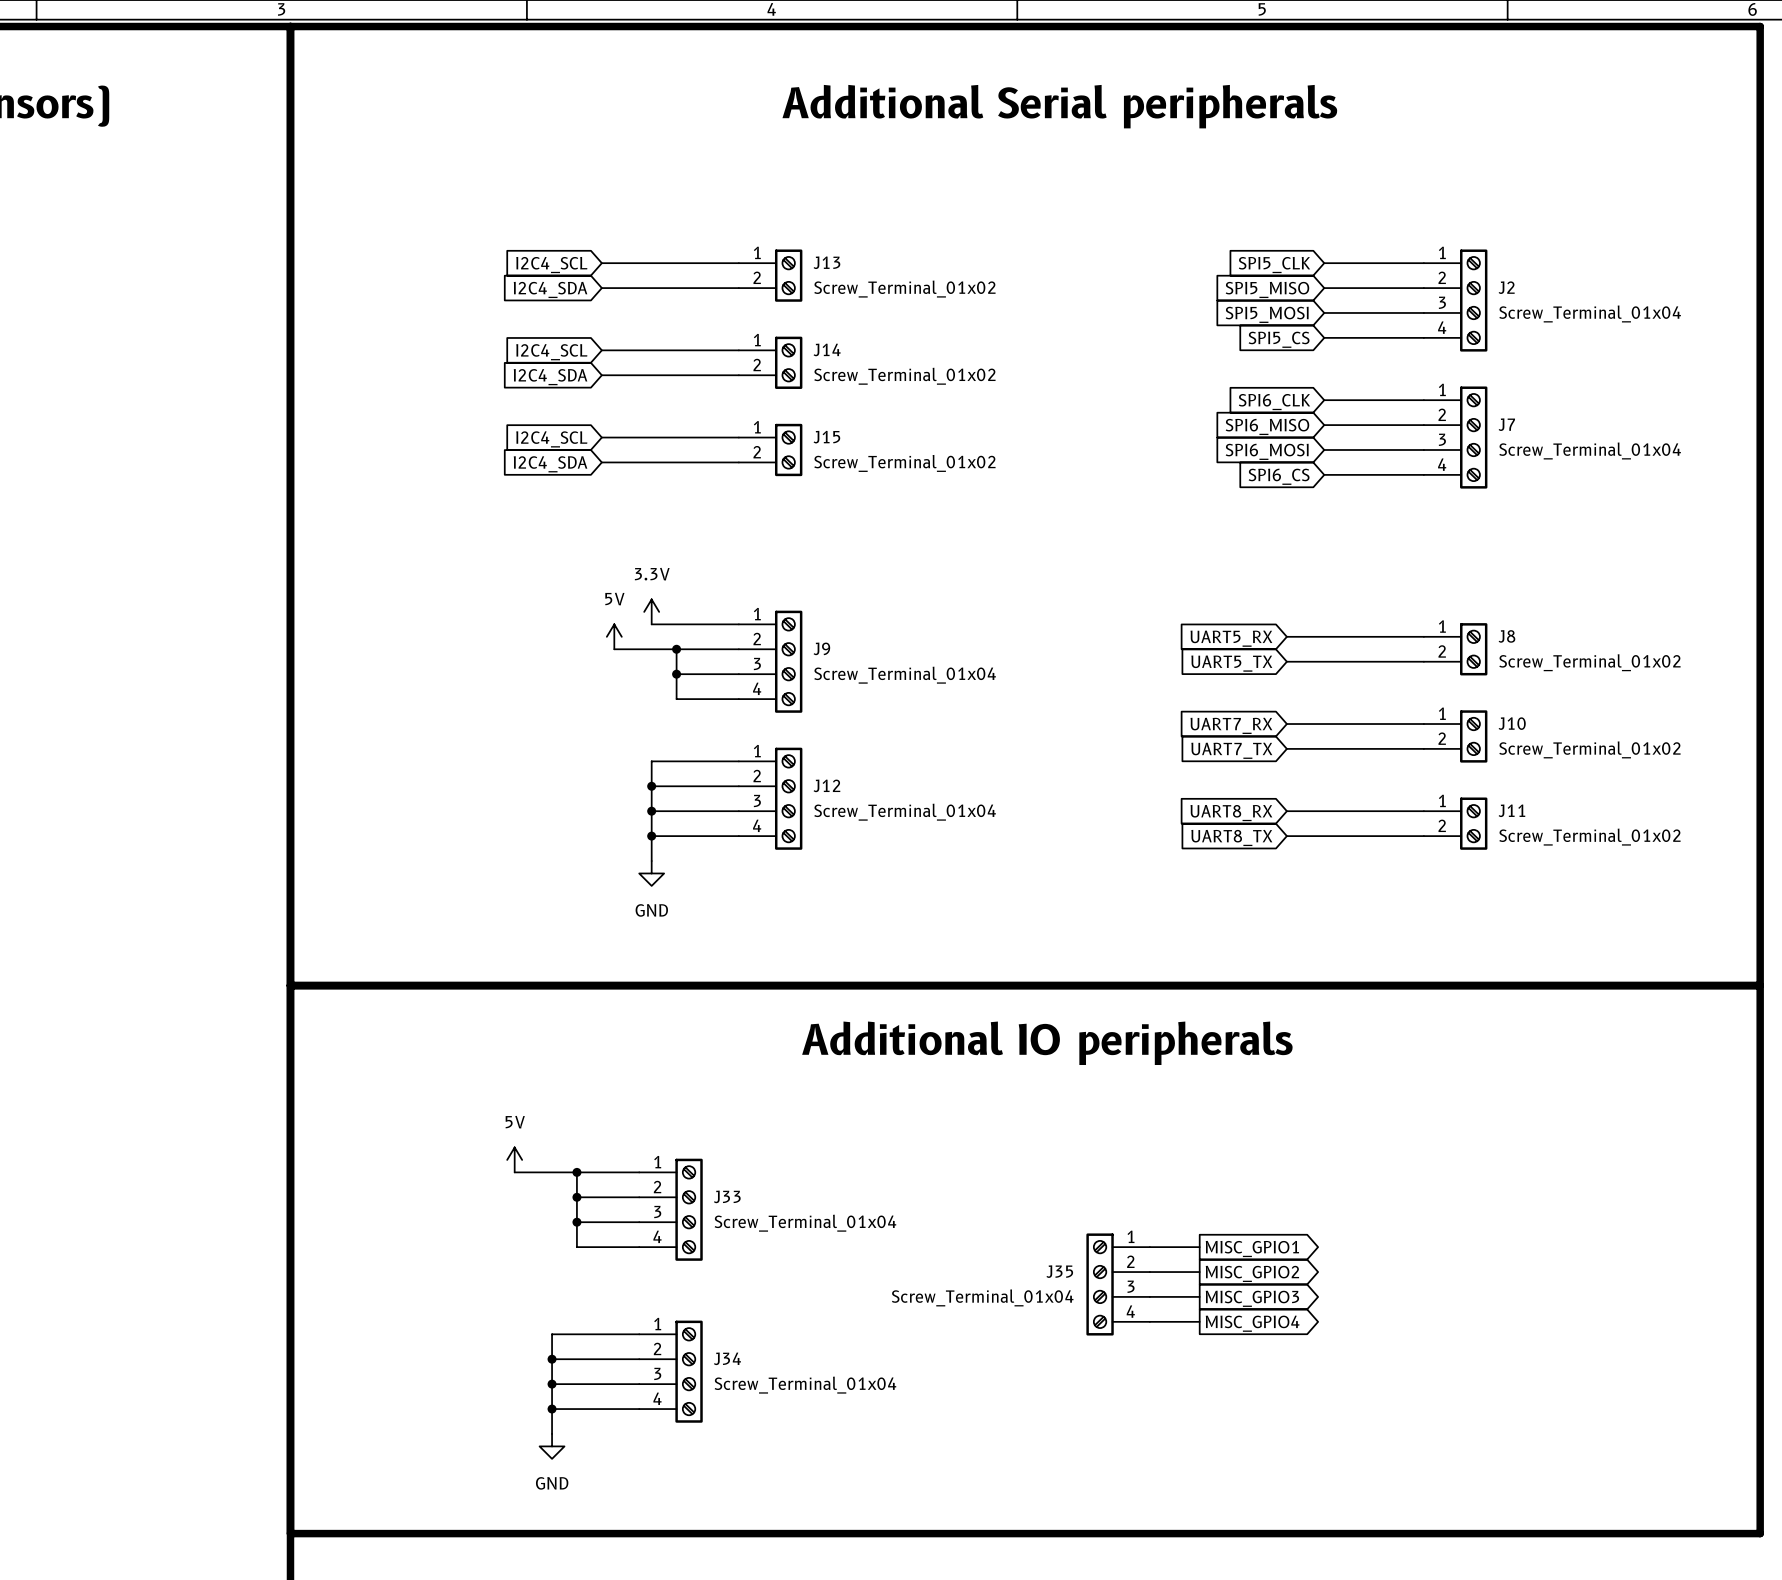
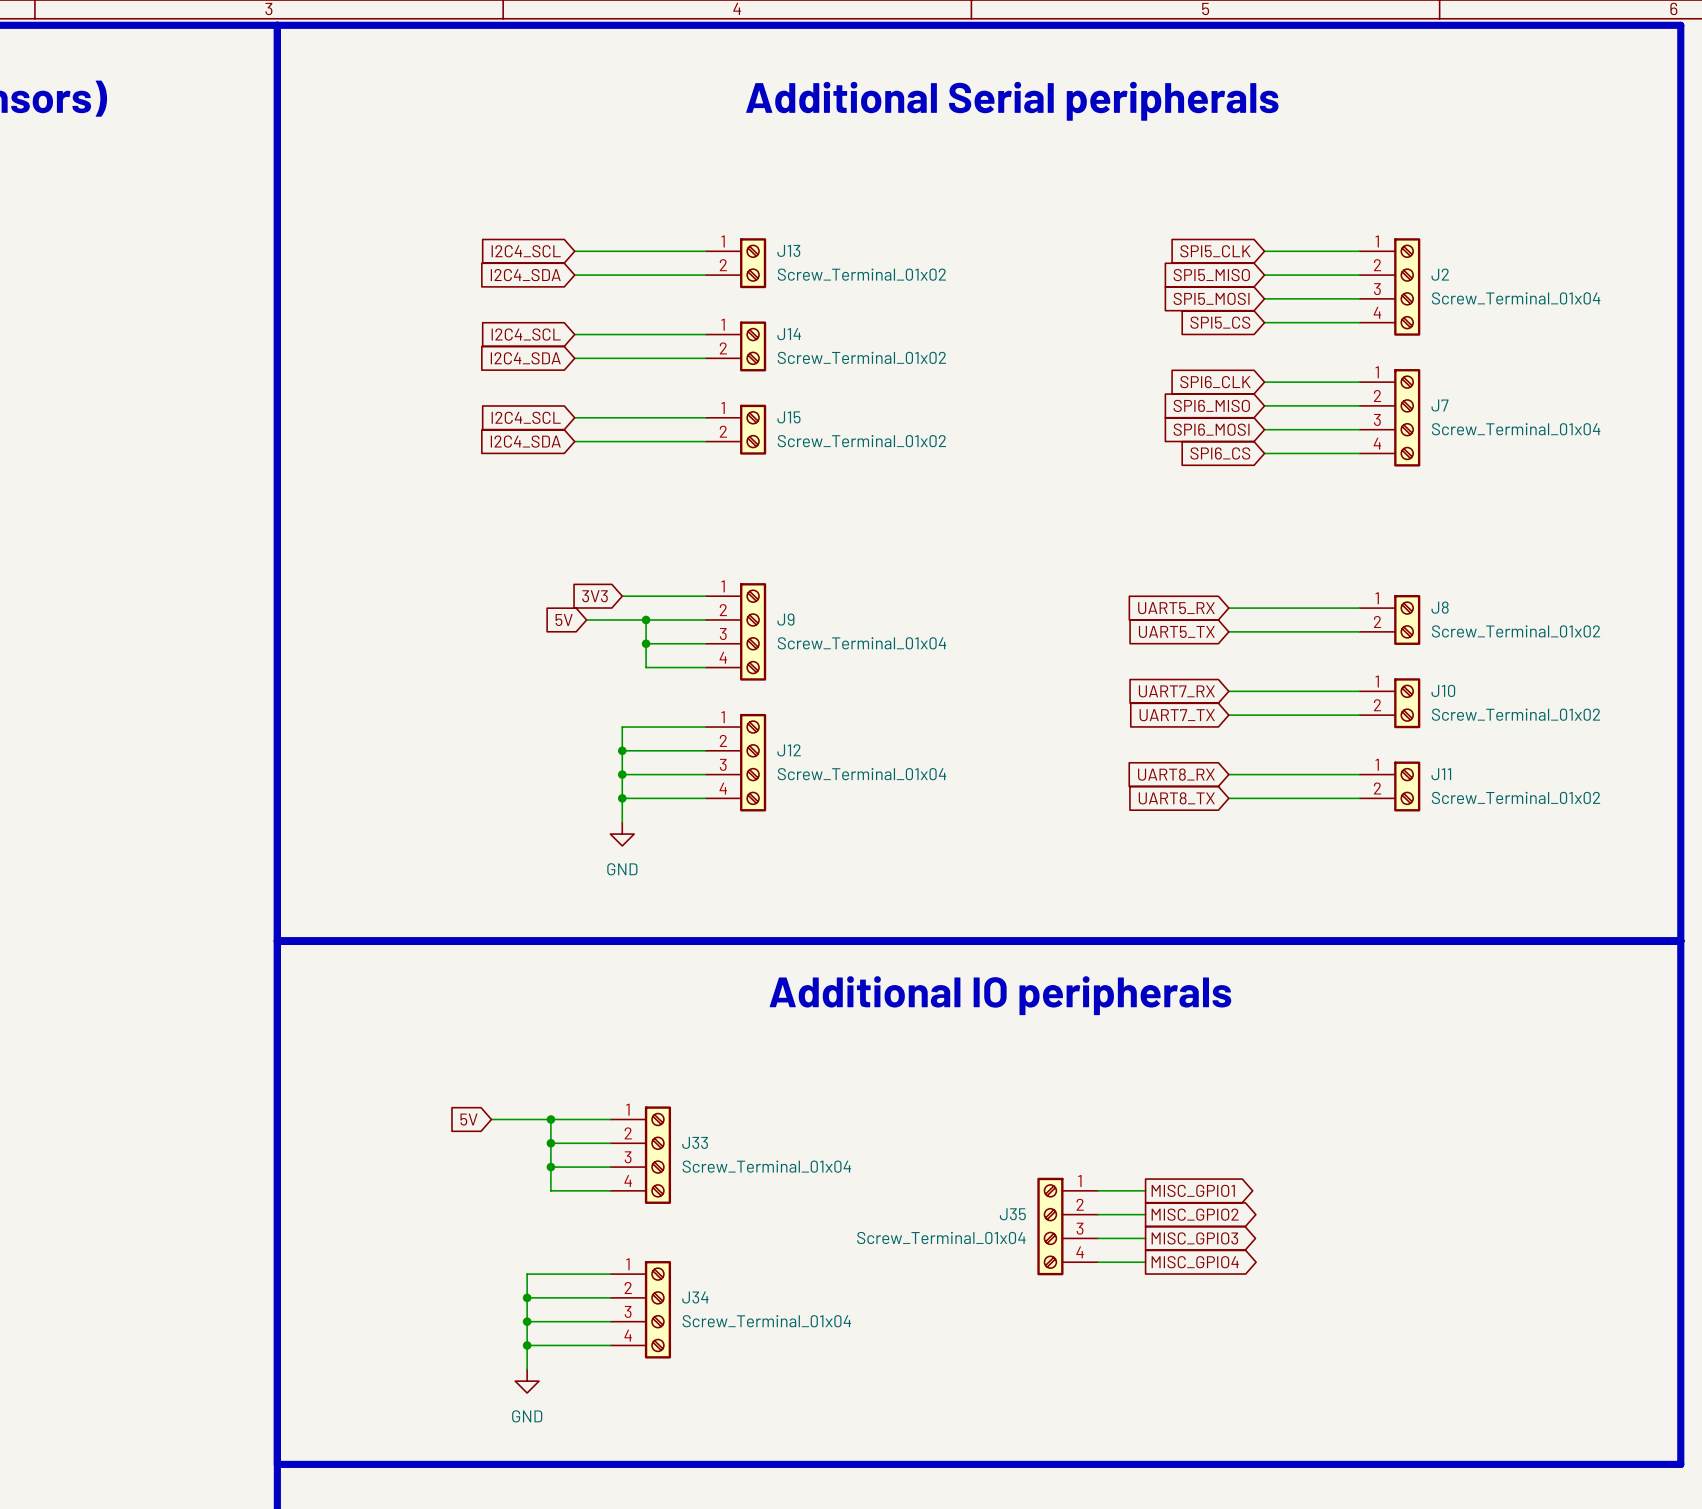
power symbol: 3.3V (651, 611) -> none
global label: none -> 3V3 (595, 596)
power symbol: 5V (614, 636) -> none
global label: none -> 5V (564, 620)
power symbol: 5V (514, 1159) -> none
global label: none -> 5V (468, 1119)

